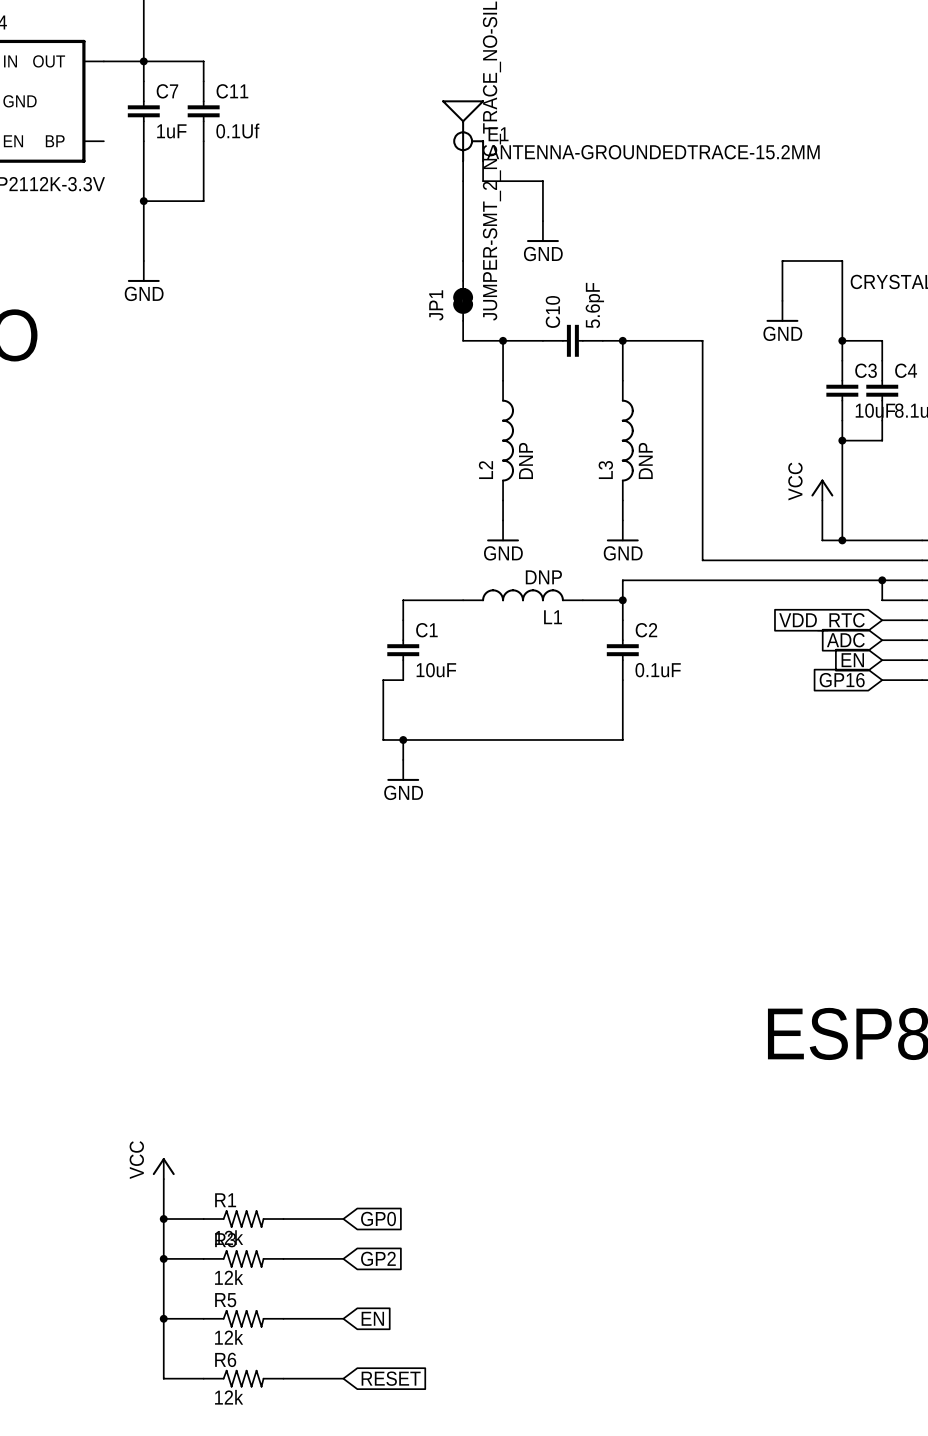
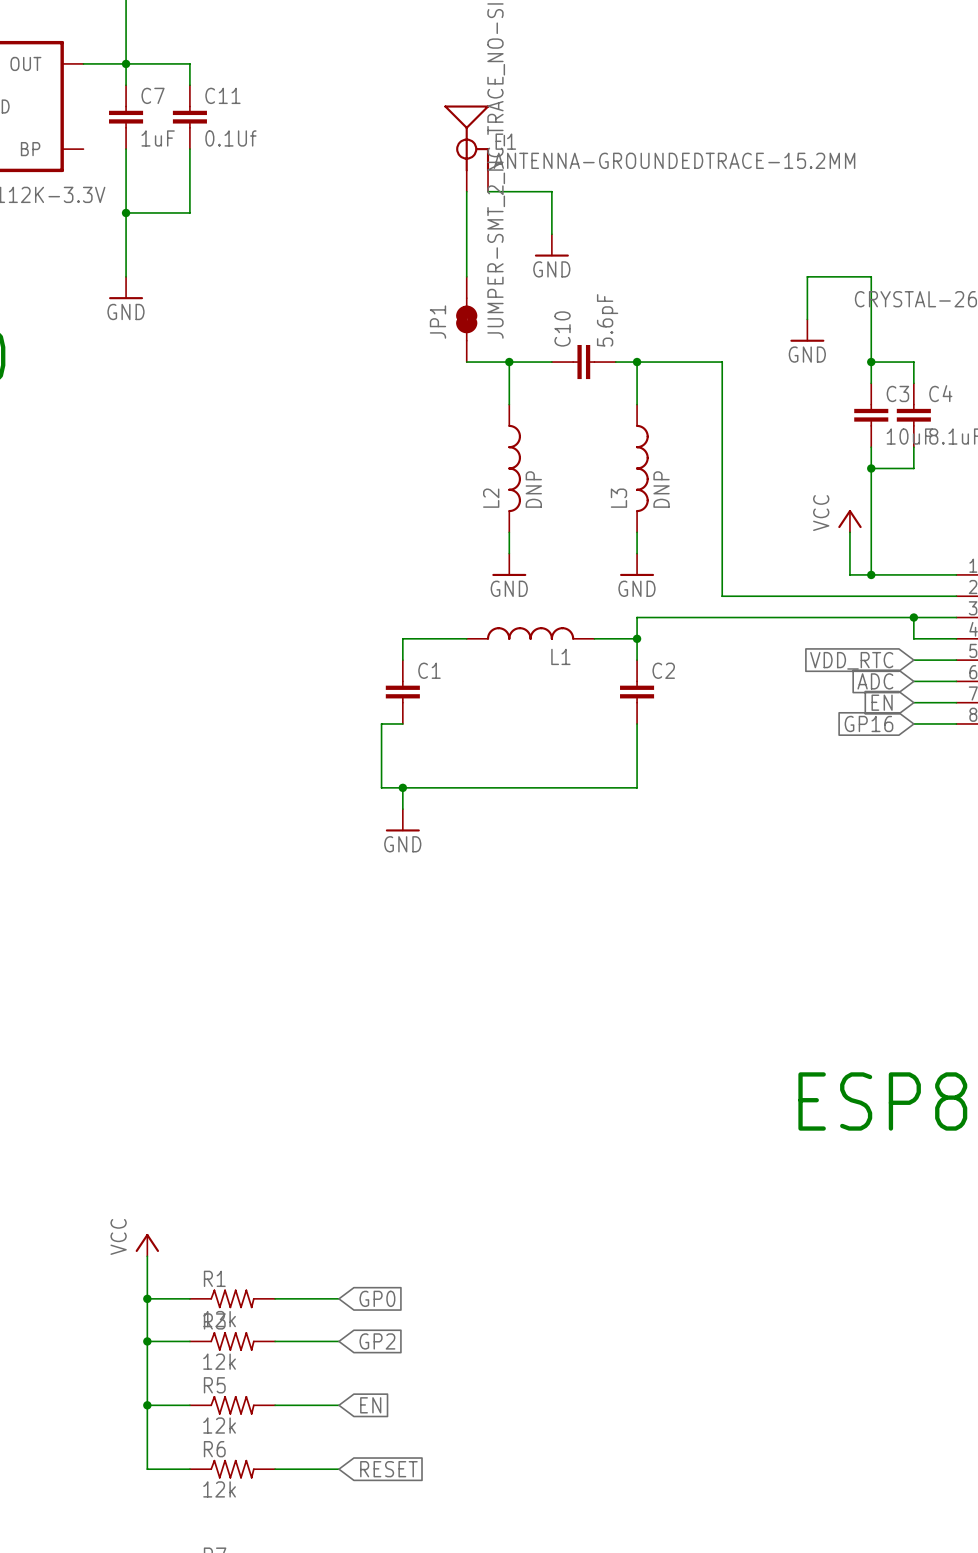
L1 value: DNP (543, 577) -> none
C1 value: 10uF (436, 670) -> none
C2 value: 0.1uF (658, 670) -> none

